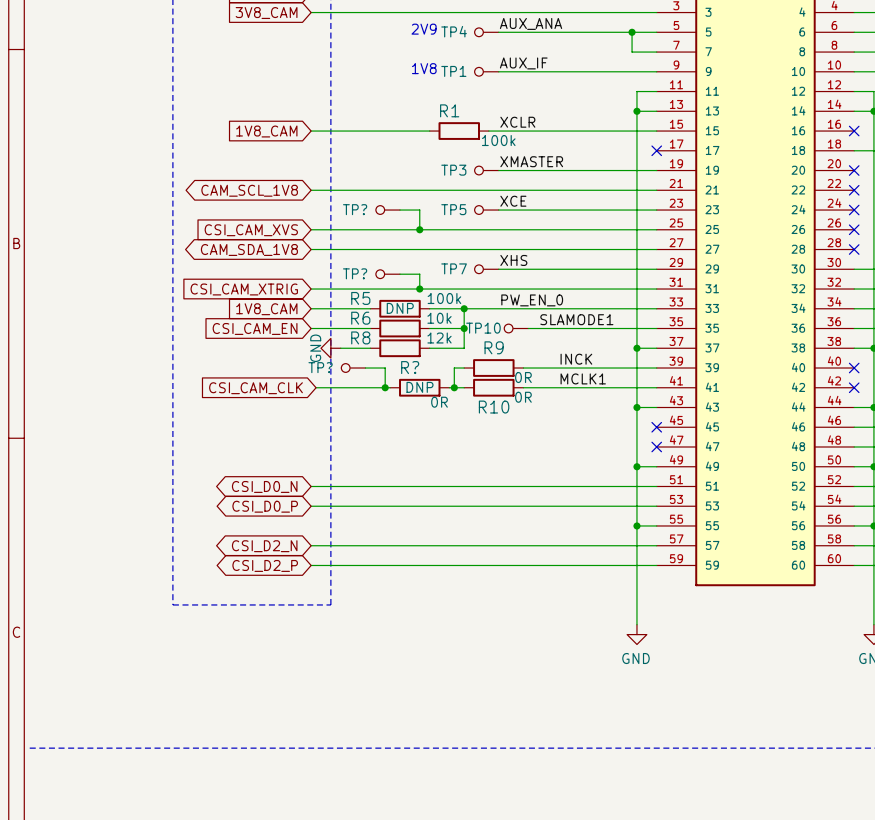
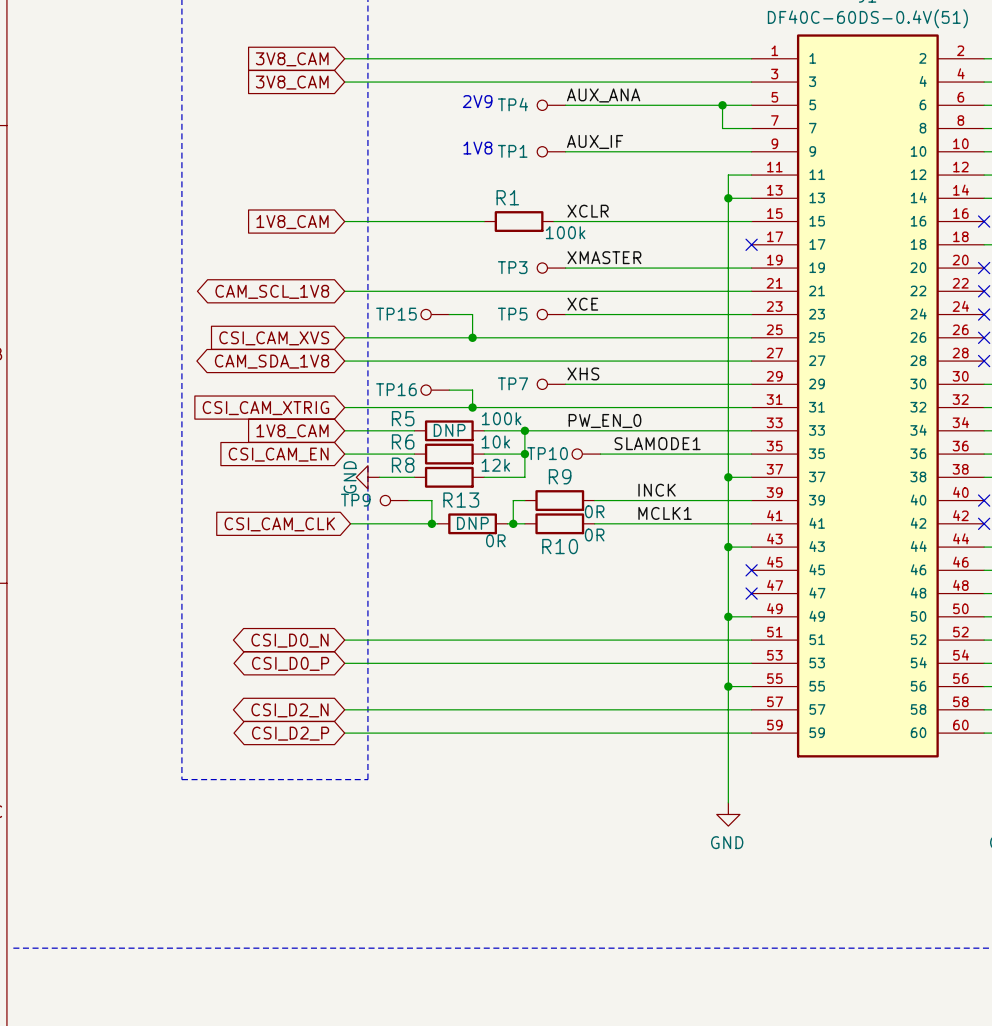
TP? name: TP? (355, 209) -> TP15 (396, 314)
TP? name: TP? (355, 273) -> TP16 (396, 389)
TP? name: TP? (320, 367) -> TP9 (355, 500)
R? name: R? (410, 367) -> R13 (461, 500)

